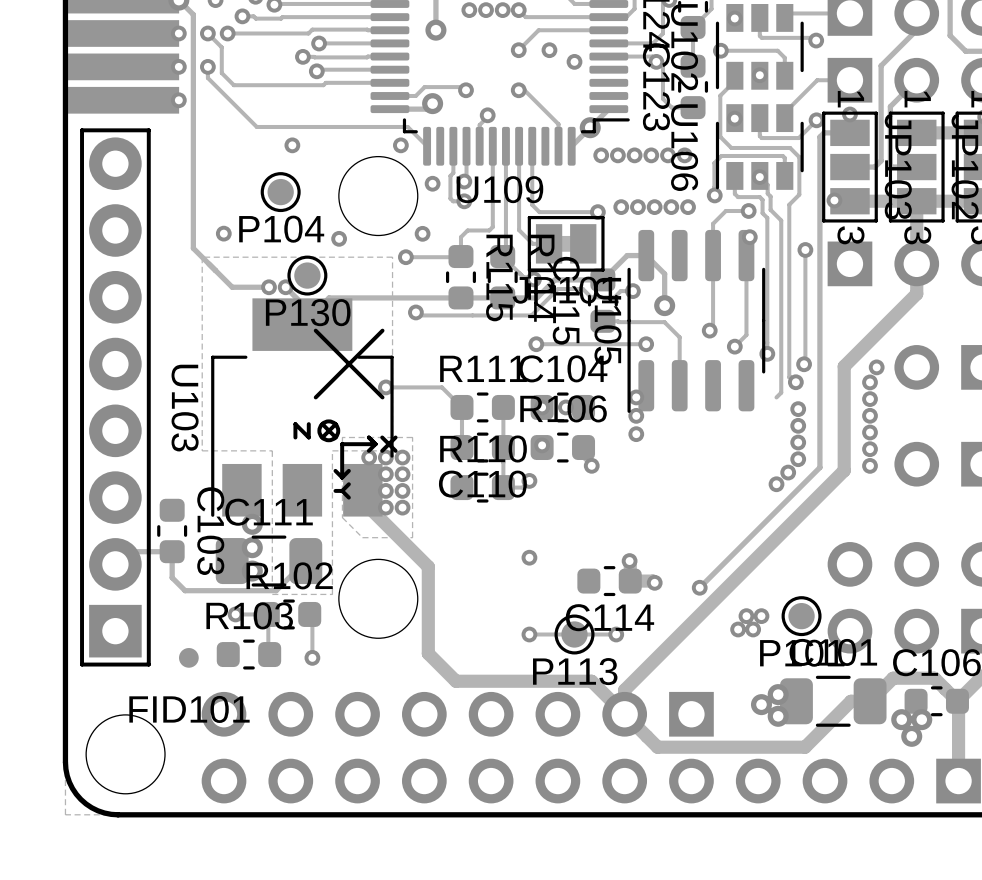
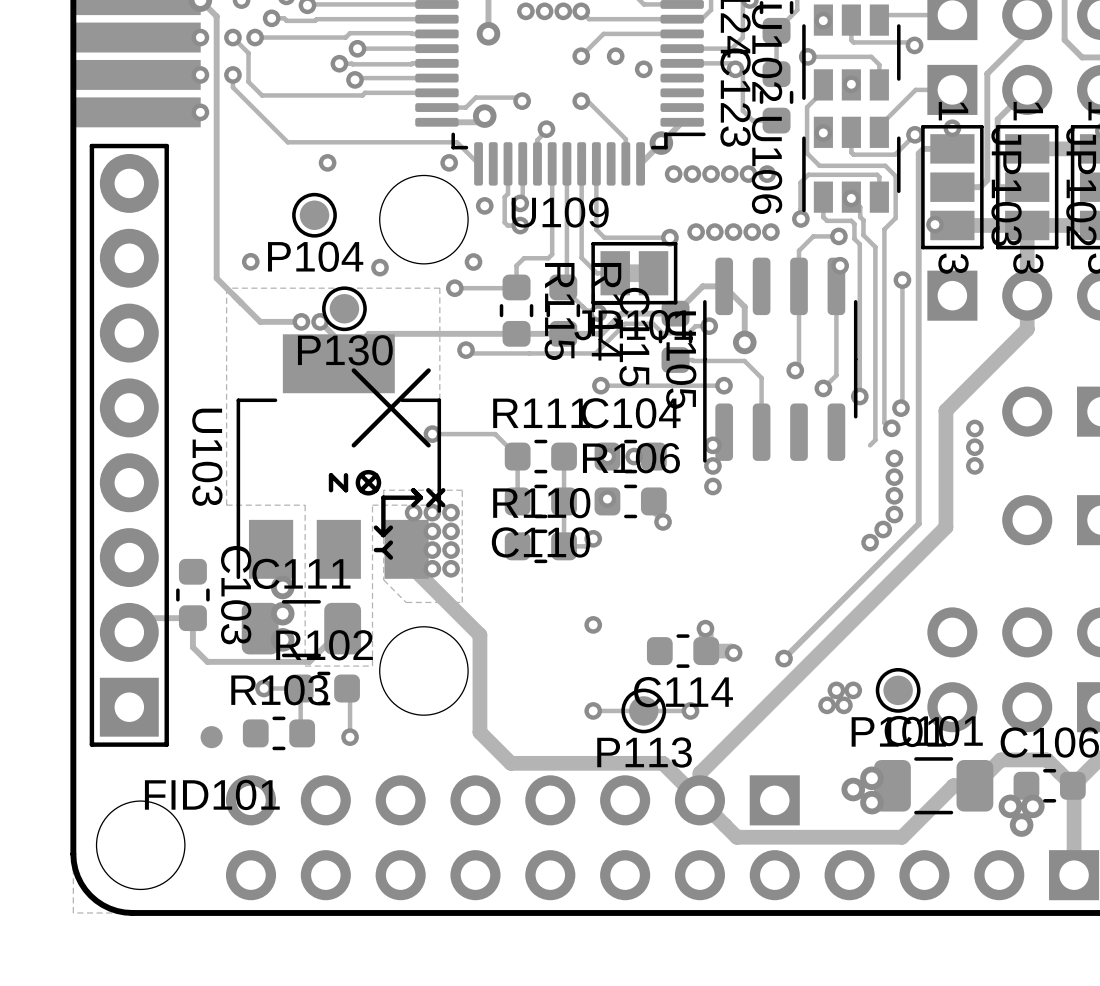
via: (876, 367) -> none
via: (870, 432) -> none
via: (870, 449) -> none
via: (870, 465) -> none

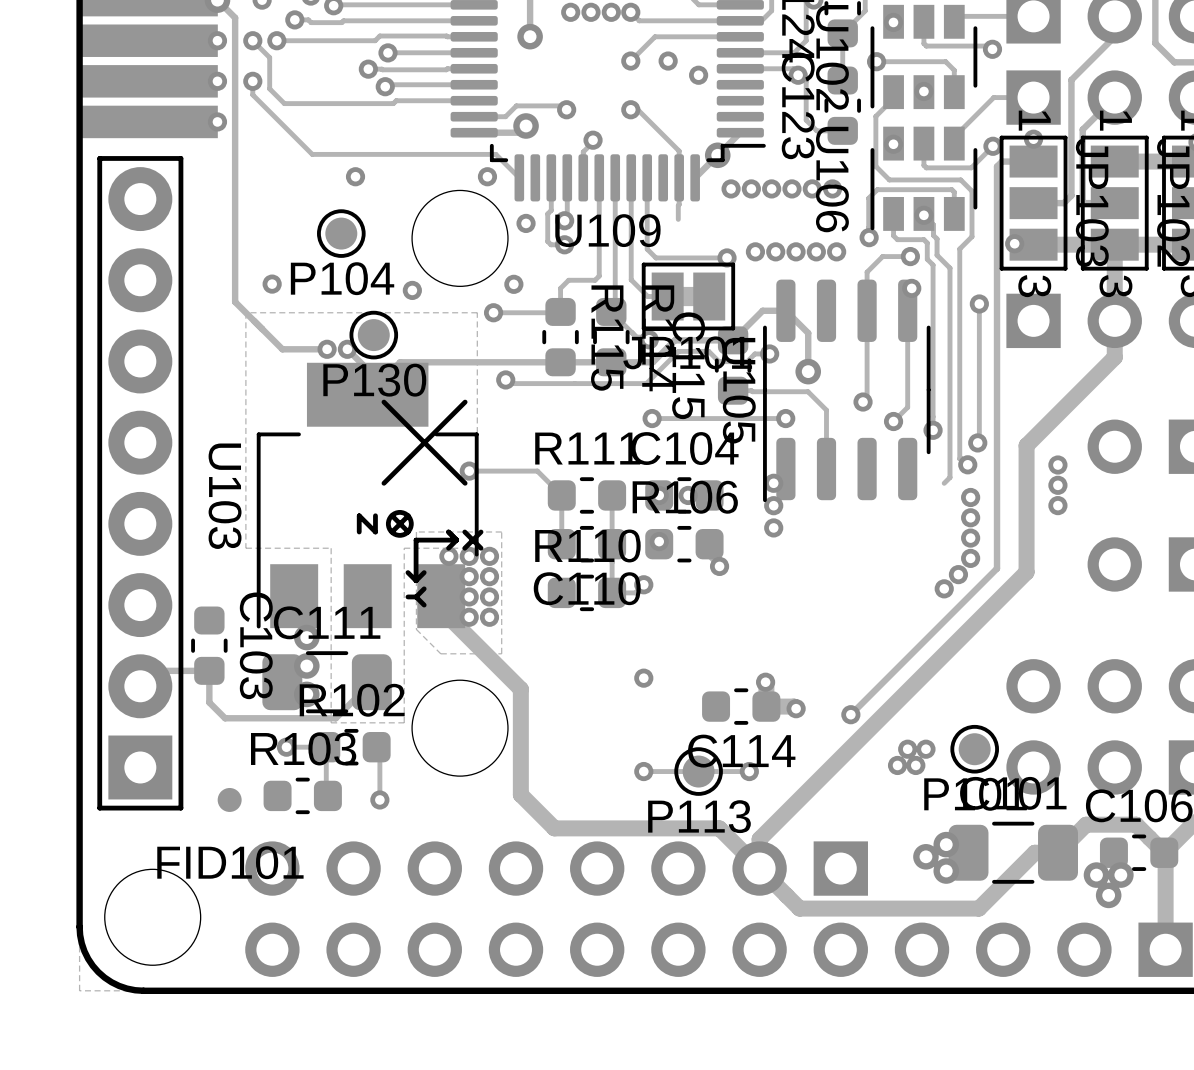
track: none -> (679, 177) (678, 219)

